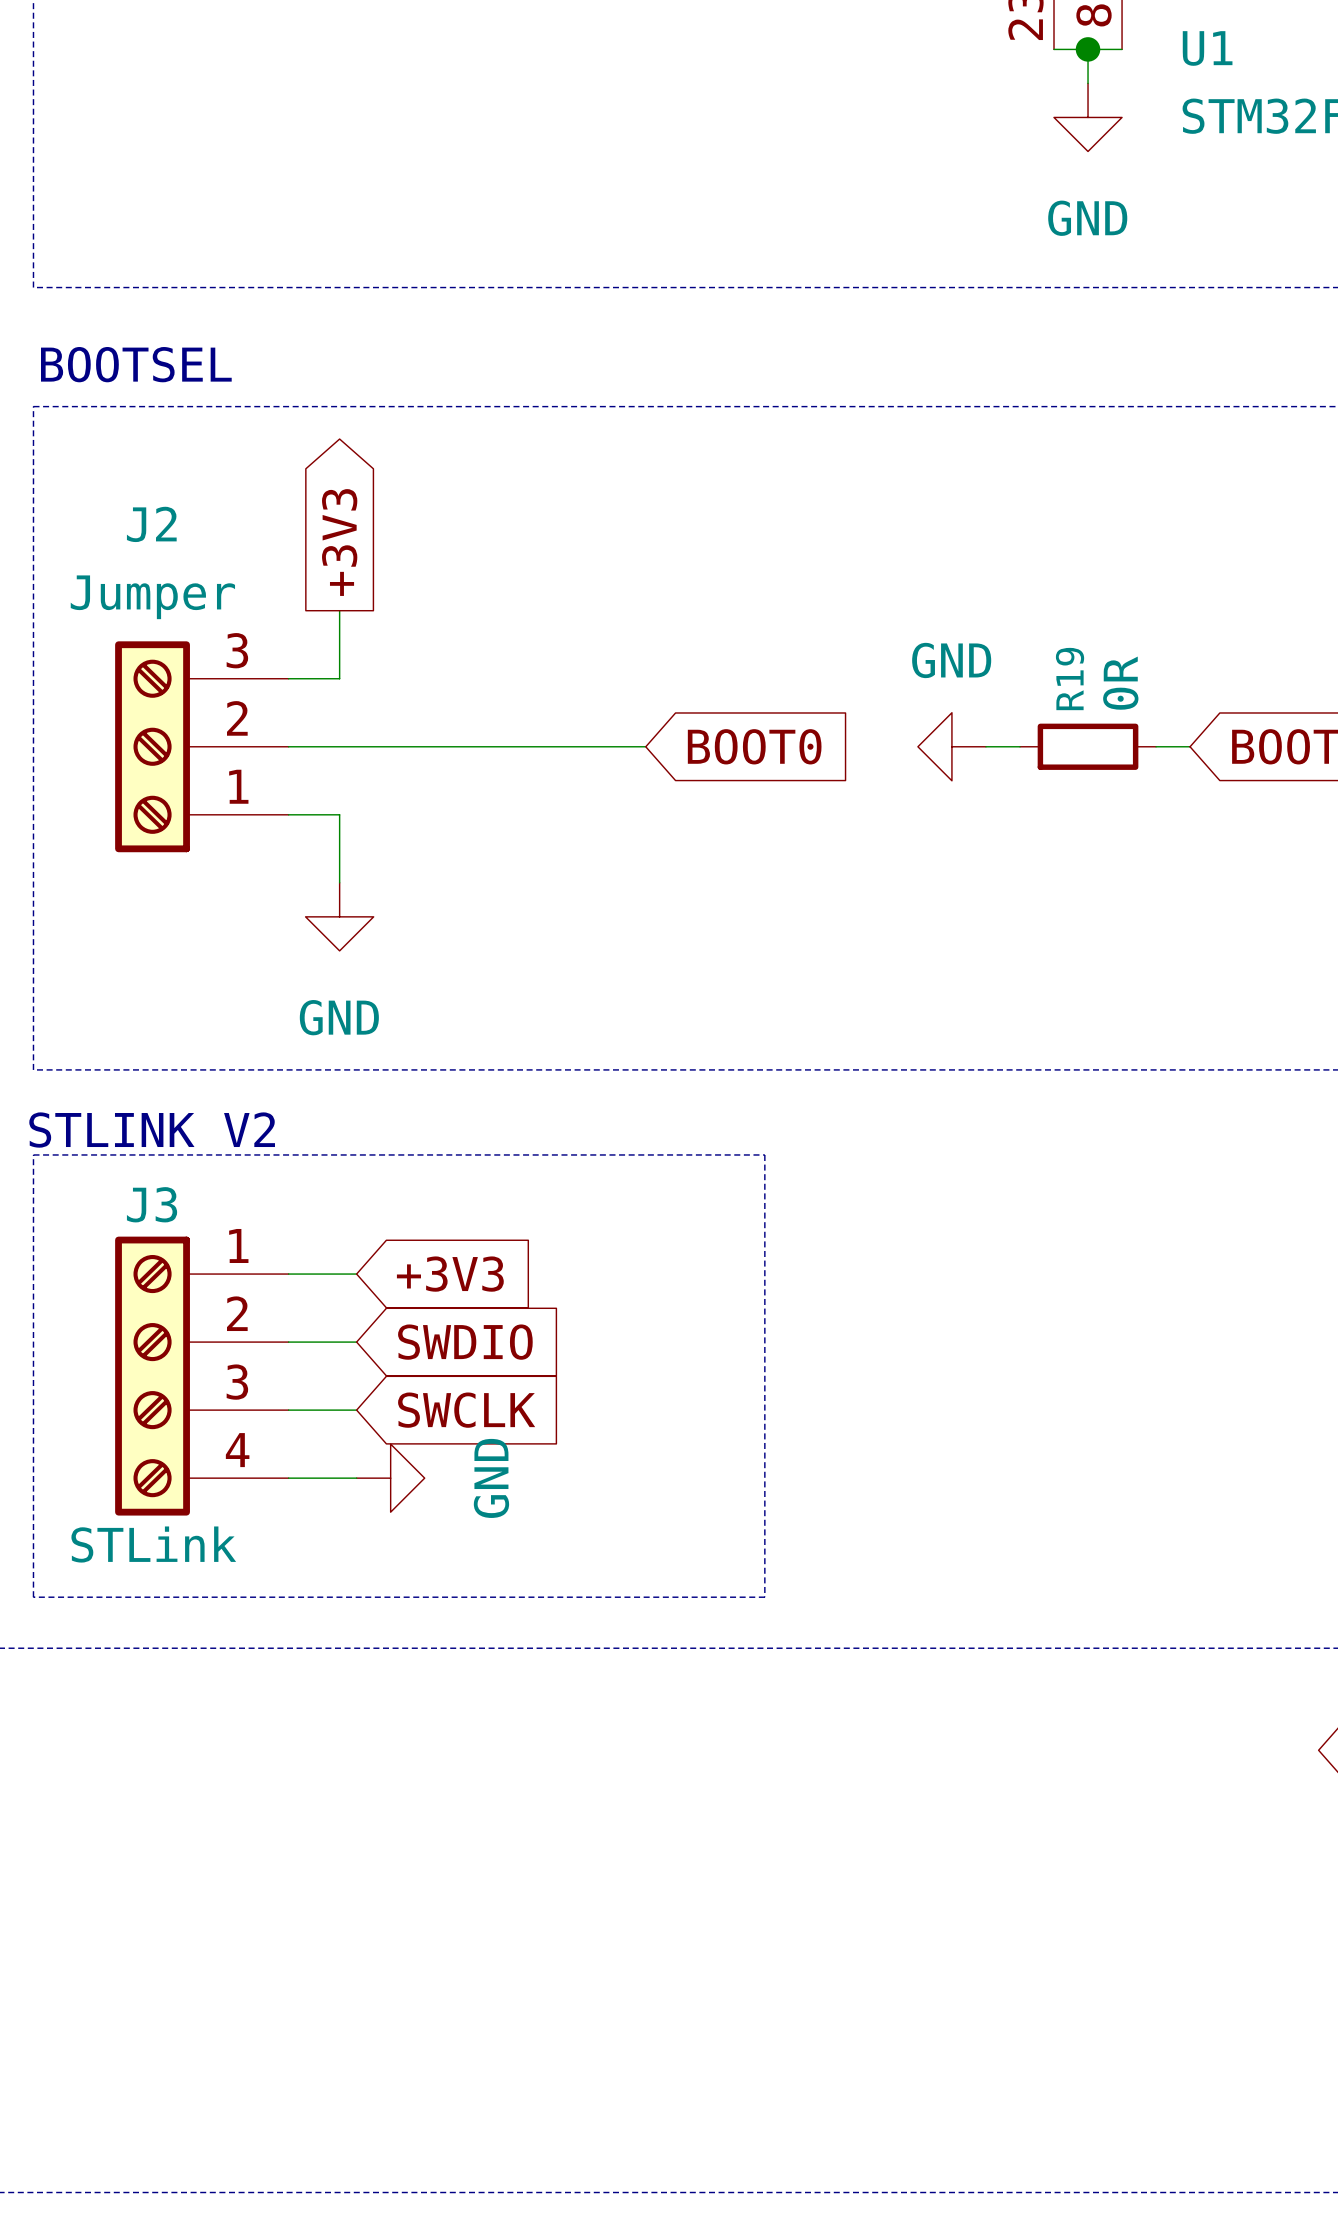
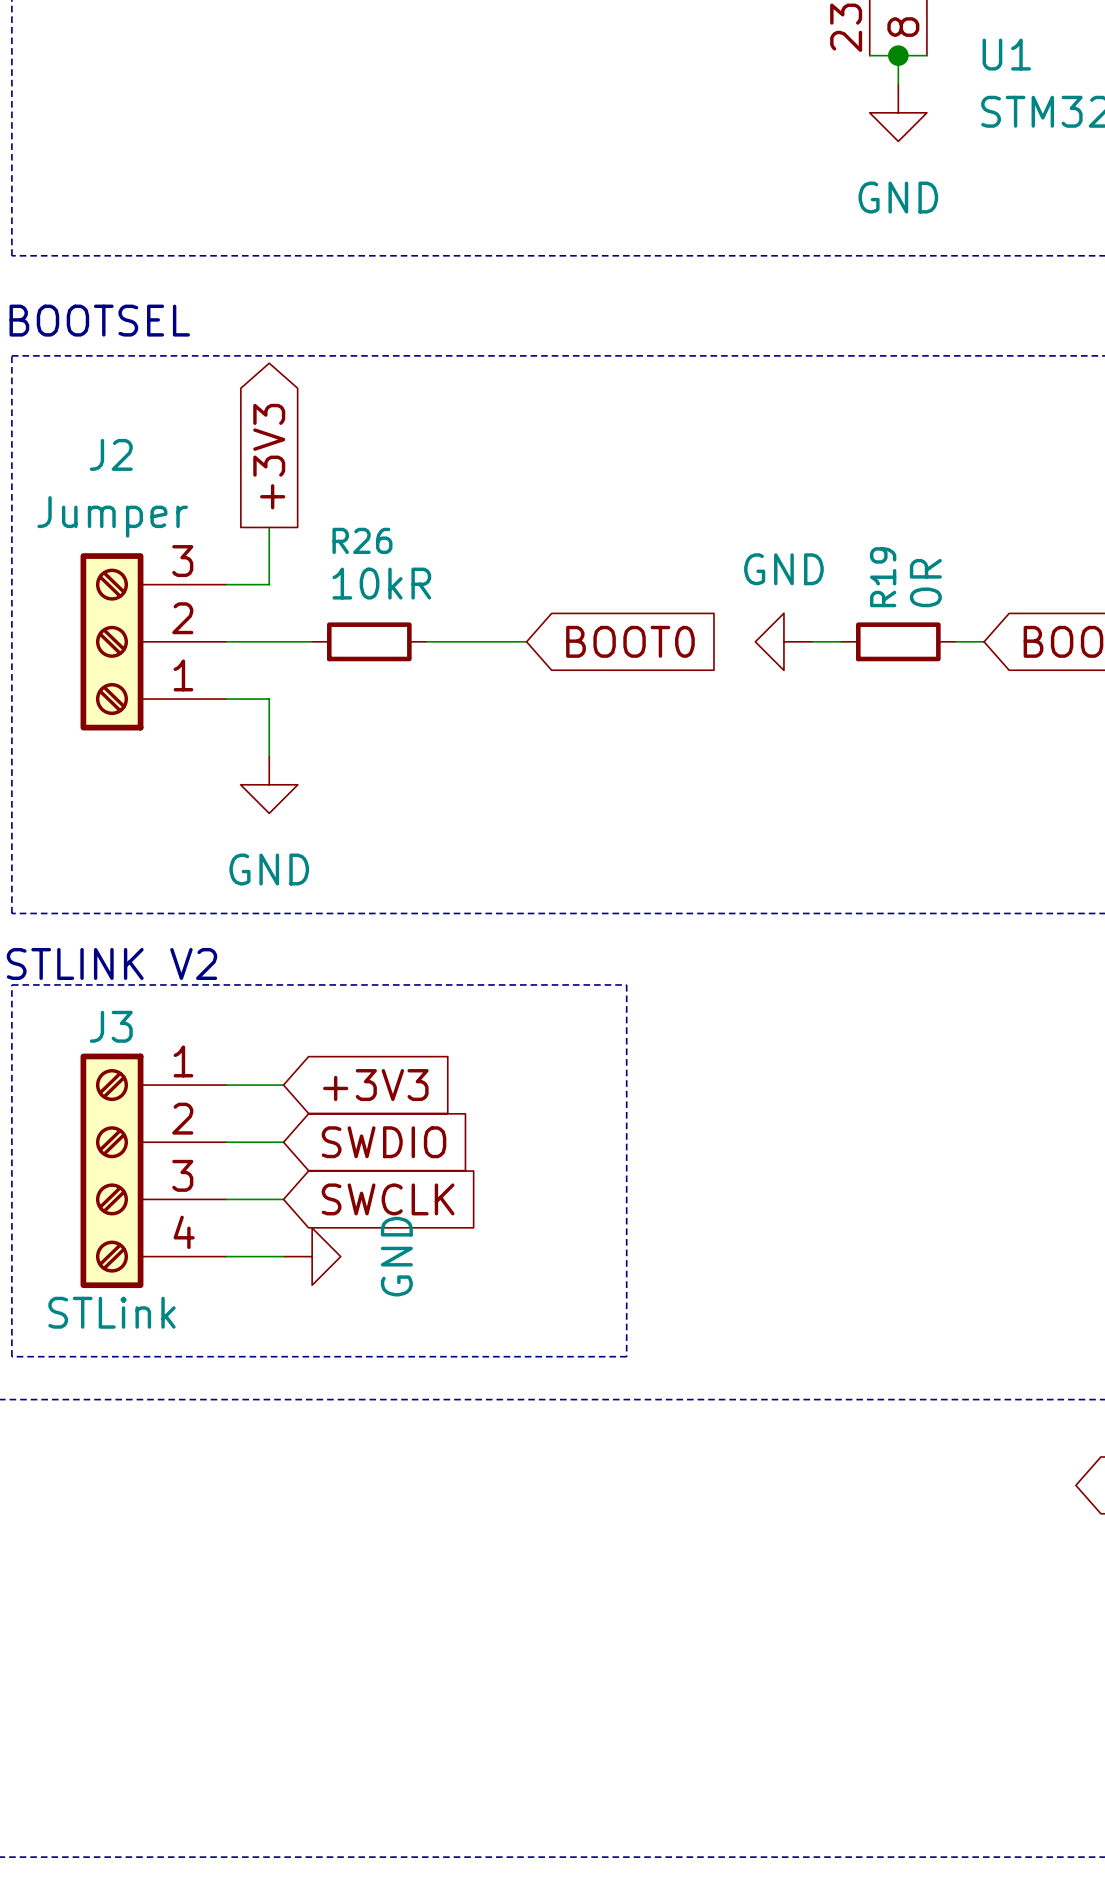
wire: (390, 746) (526, 746) -> none
R26: none -> 10kR (369, 641)

